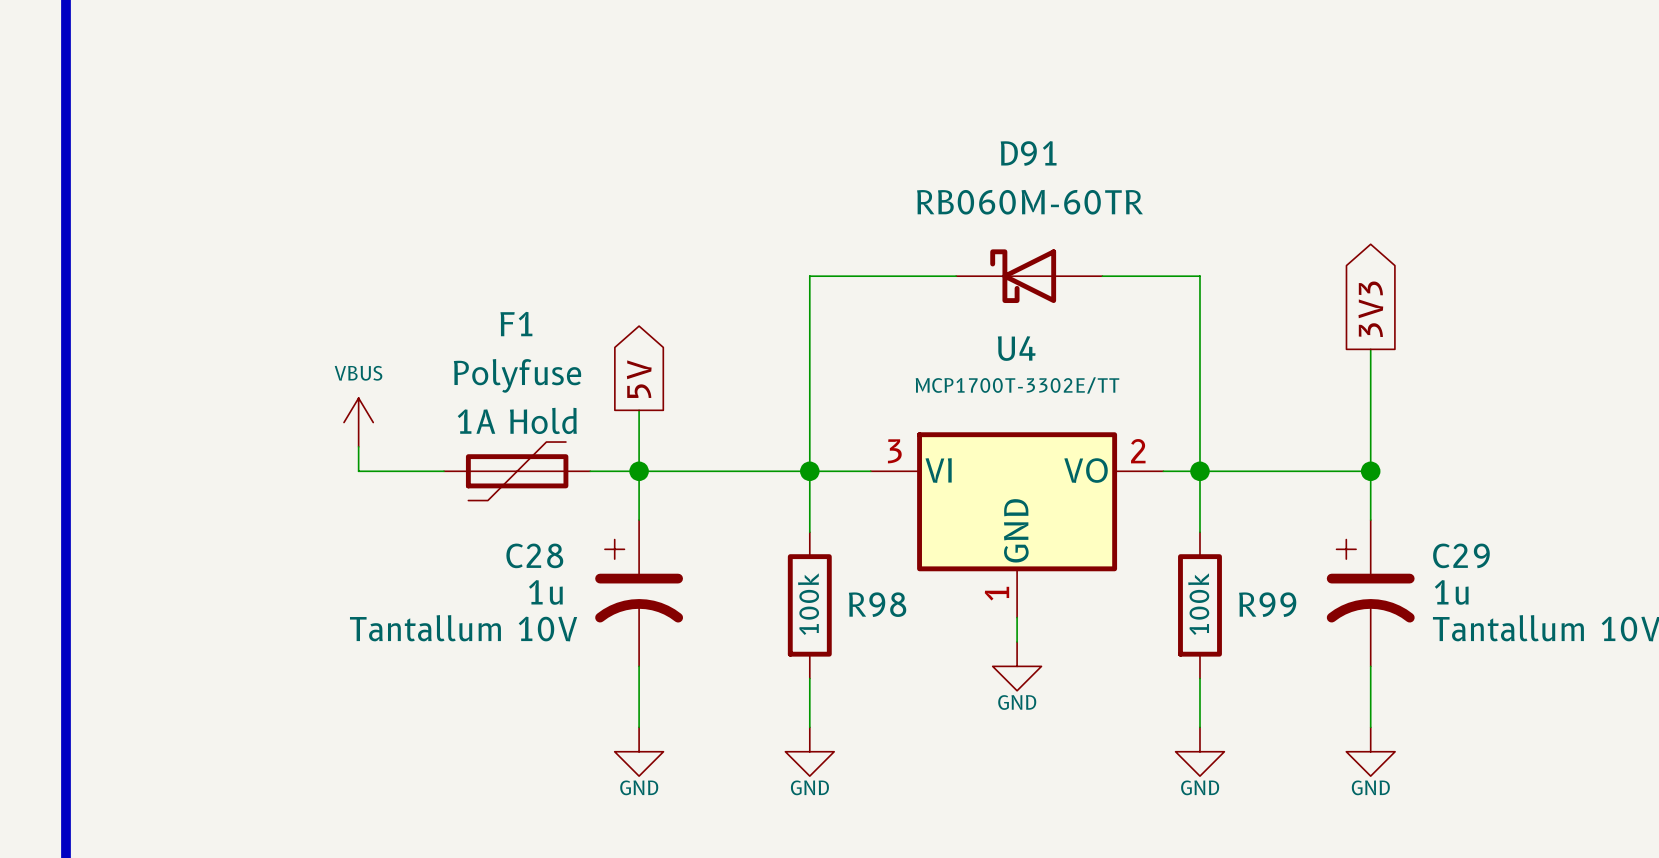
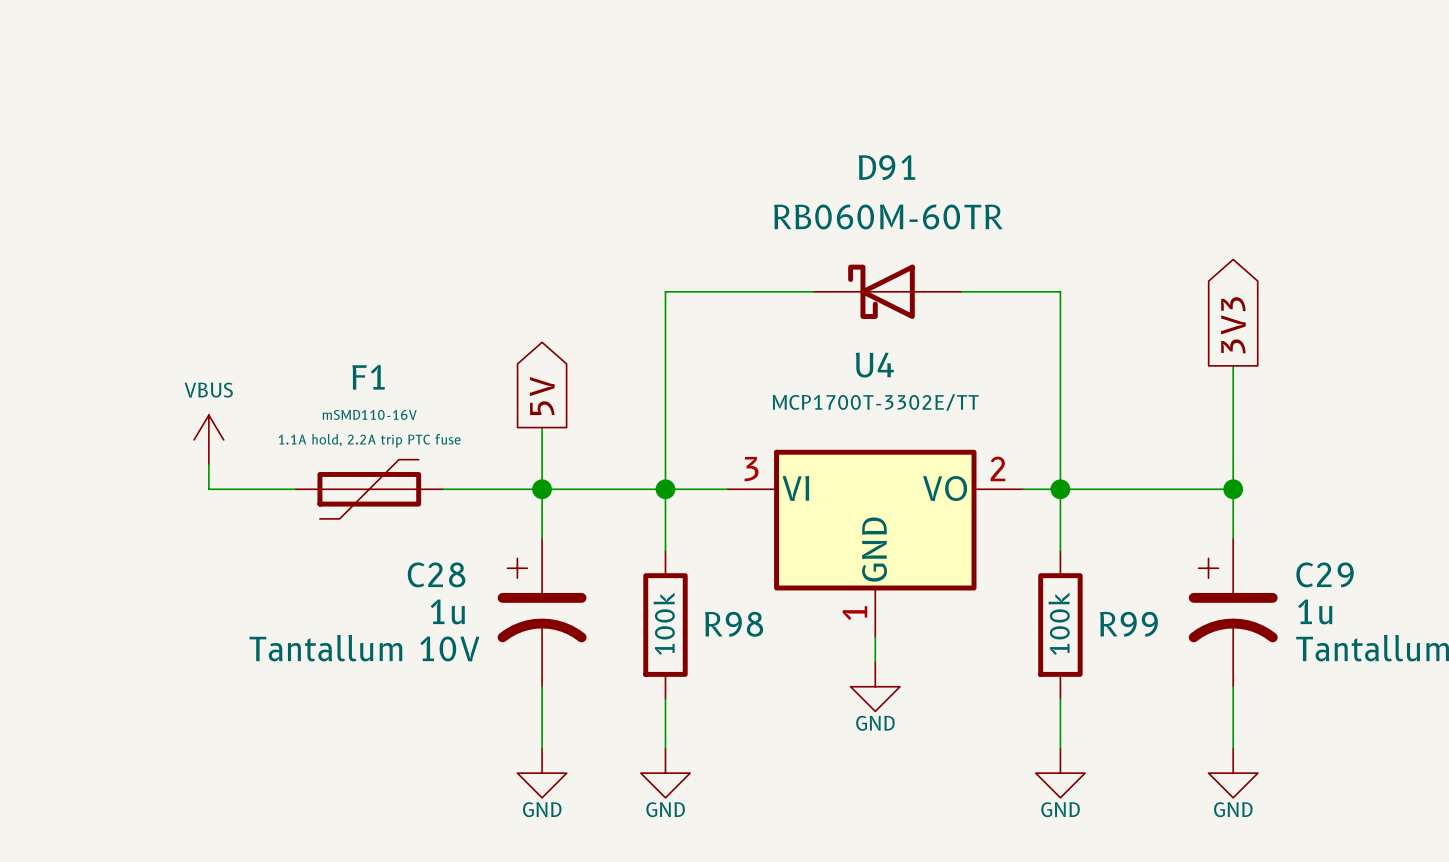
F1 name position: F1 (516, 324) -> F1 (368, 377)
F1 value: Polyfuse (517, 375) -> mSMD110-16V (369, 414)
global label position: 5V (639, 379) -> 5V (542, 396)
wire: (639, 410) (639, 520) -> (542, 427) (542, 538)
F1 text: 1A Hold (517, 420) -> none
F1 text: none -> 1.1A hold, 2.2A trip PTC fuse (369, 440)
junction position: (639, 471) -> (542, 489)
C28 position: (639, 593) -> (542, 612)
wire: (639, 666) (639, 727) -> (542, 686) (542, 748)
power symbol position: GND (639, 751) -> GND (542, 773)

